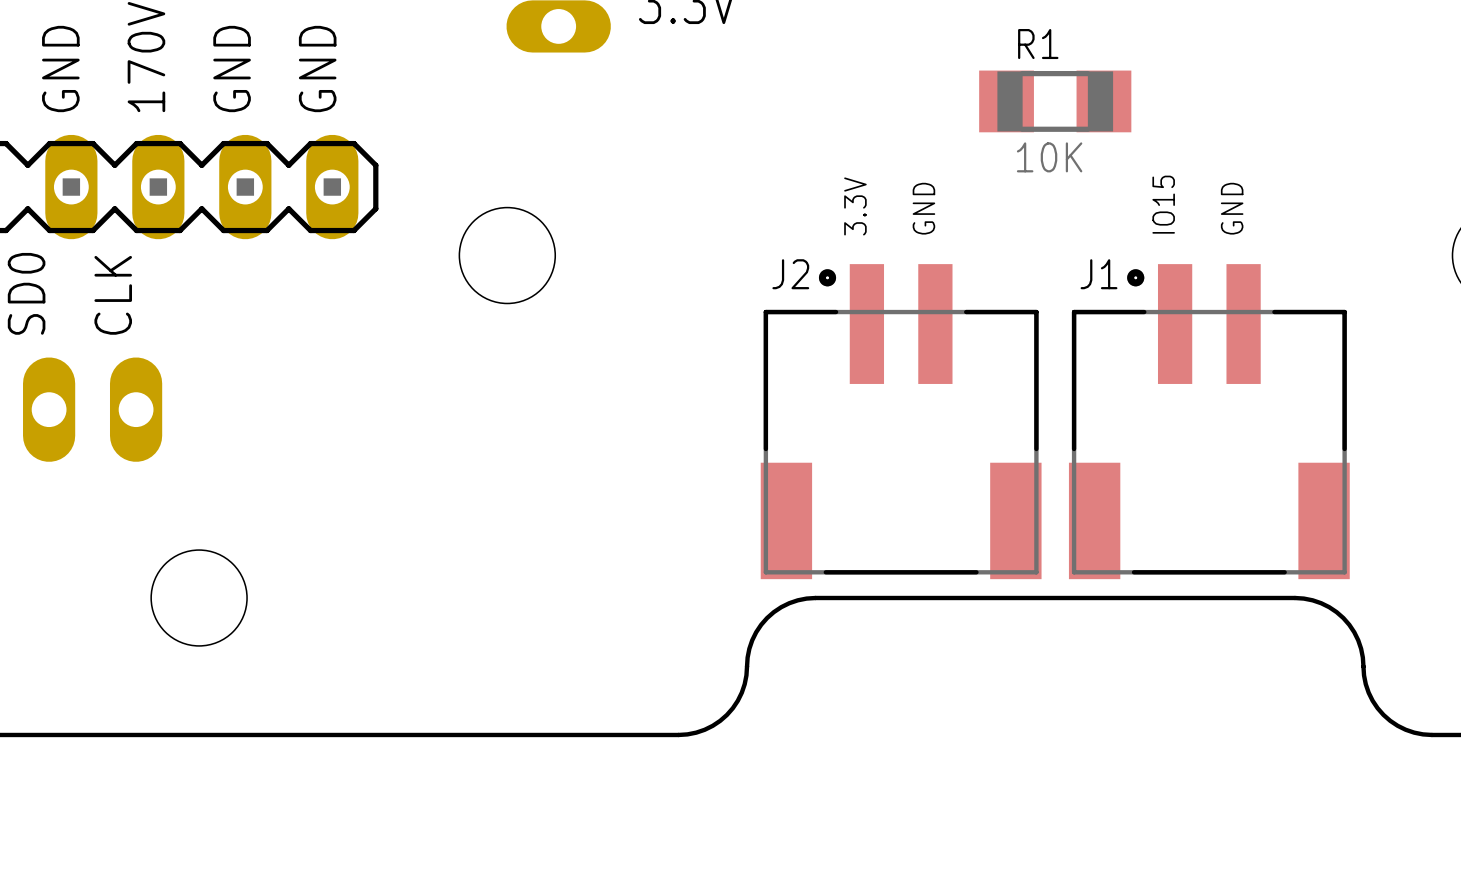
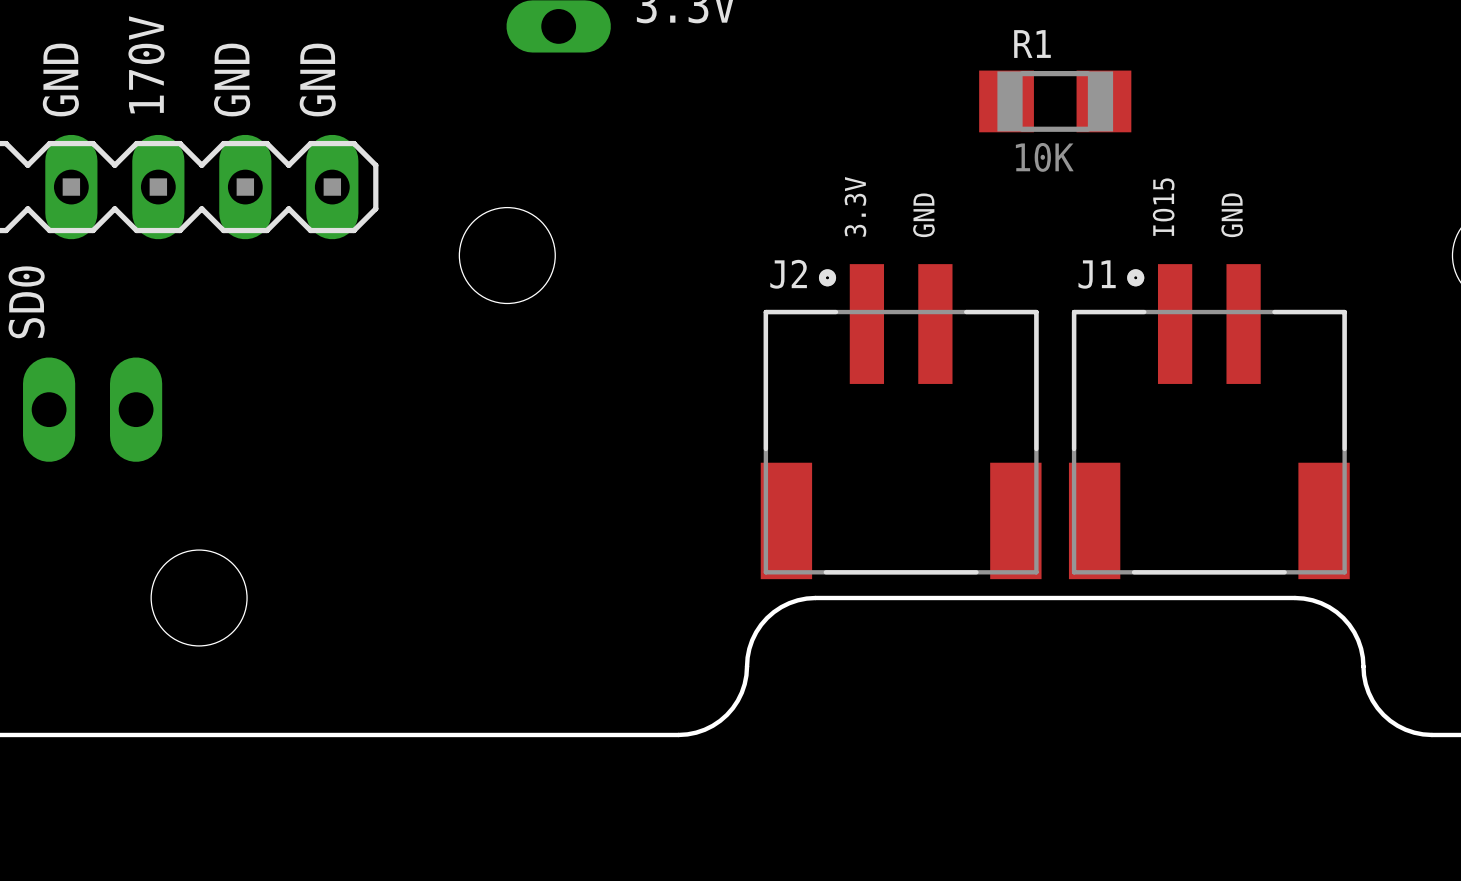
text: CLK (113, 295) -> none

